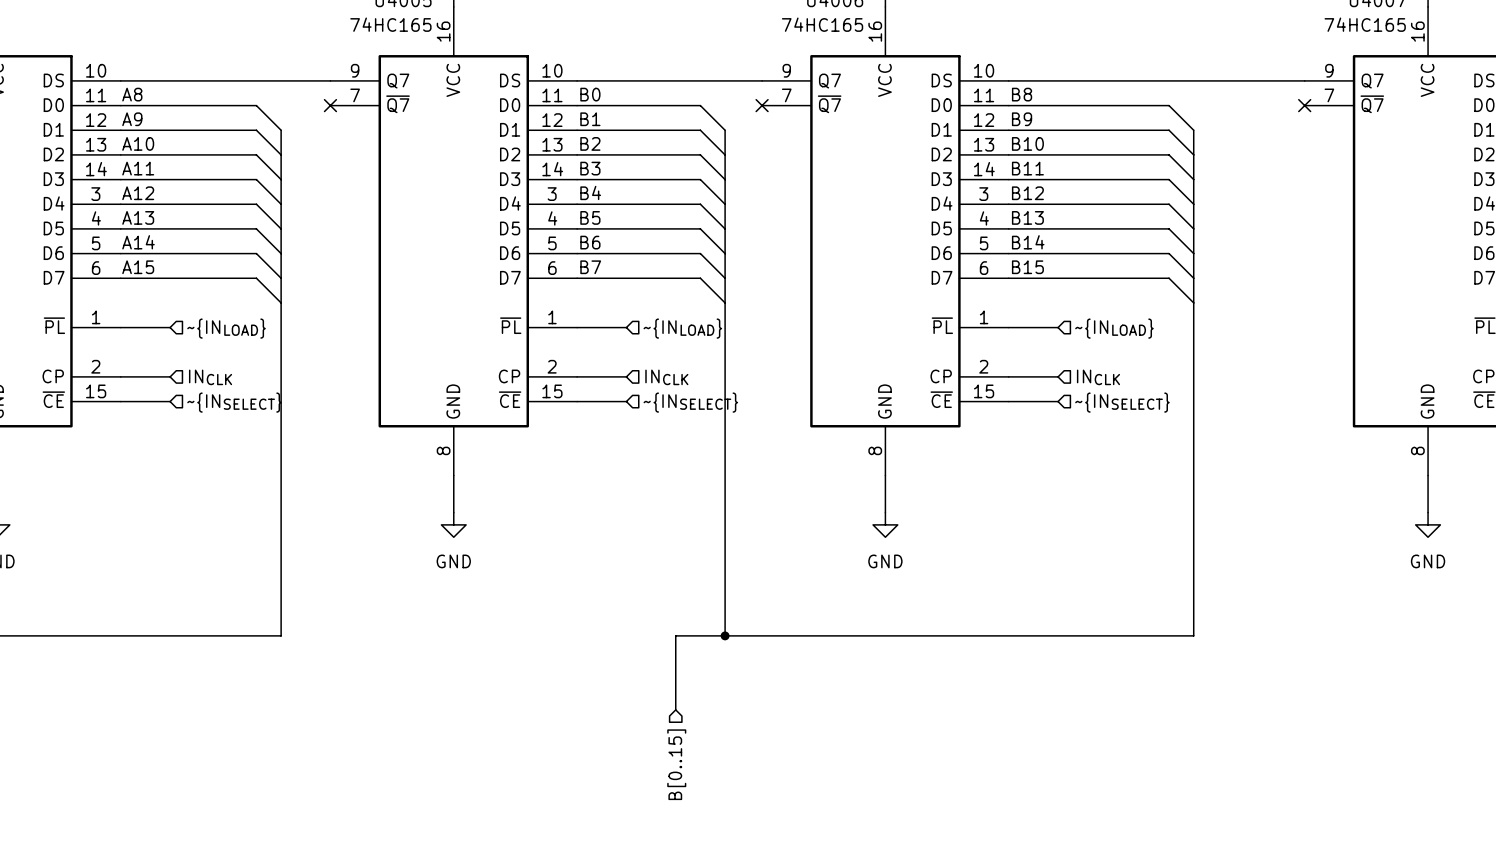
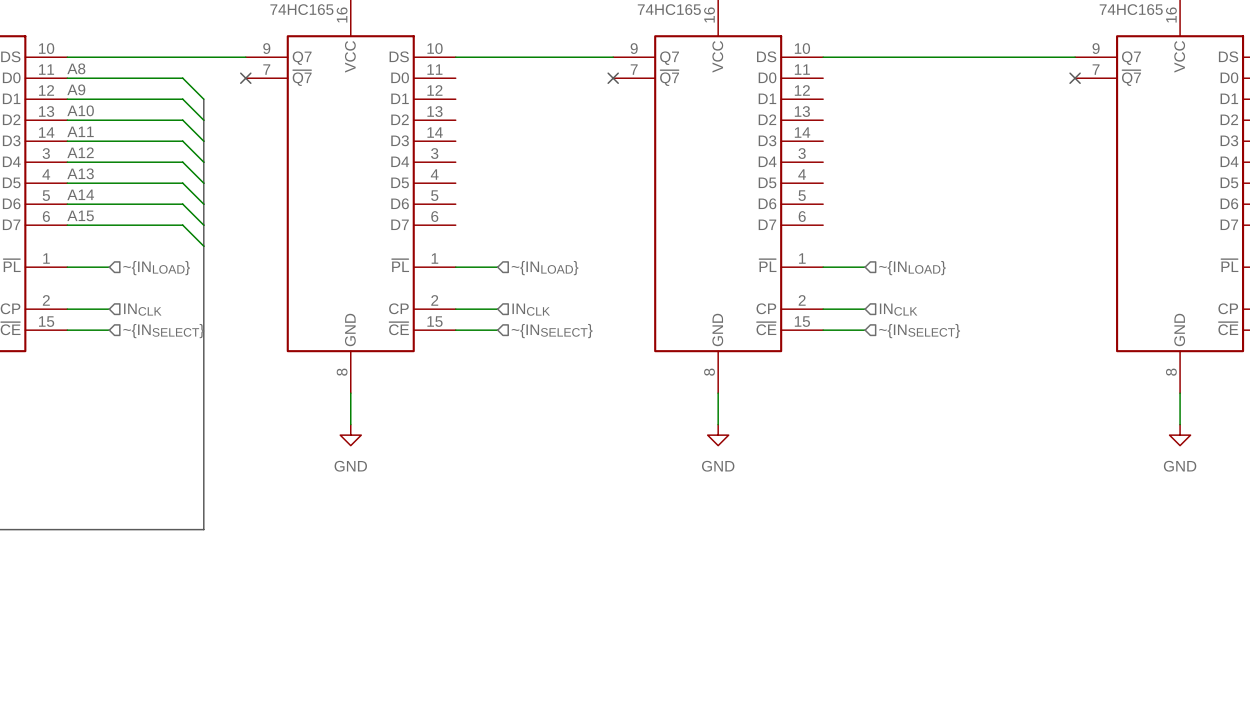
label: B0 (590, 94) -> none
label: B8 (1022, 94) -> none
wire: (577, 105) (700, 105) (725, 130) -> none
wire: (1008, 105) (1169, 105) (1193, 130) -> none
label: B1 (590, 119) -> none
label: B9 (1022, 119) -> none
wire: (577, 130) (700, 130) (725, 154) -> none
bus: (725, 130) (725, 635) -> none
wire: (1008, 130) (1169, 130) (1193, 154) -> none
bus: (1193, 130) (1193, 635) (675, 635) (675, 709) -> none
label: B2 (590, 143) -> none
label: B10 (1027, 143) -> none
wire: (577, 154) (700, 154) (725, 179) -> none
wire: (1008, 154) (1169, 154) (1193, 179) -> none
label: B3 (590, 168) -> none
label: B11 (1027, 168) -> none
wire: (577, 179) (700, 179) (725, 204) -> none
wire: (1008, 179) (1169, 179) (1193, 204) -> none
label: B4 (590, 192) -> none
label: B12 (1027, 193) -> none
wire: (577, 204) (700, 204) (725, 228) -> none
wire: (1008, 204) (1169, 204) (1193, 228) -> none
label: B5 (590, 217) -> none
label: B13 (1027, 217) -> none
wire: (577, 228) (700, 228) (725, 253) -> none
wire: (1008, 228) (1169, 228) (1193, 253) -> none
label: B6 (590, 242) -> none
label: B14 (1028, 242) -> none
wire: (577, 253) (700, 253) (725, 278) -> none
wire: (1008, 253) (1169, 253) (1193, 278) -> none
label: B7 (590, 267) -> none
label: B15 (1027, 267) -> none
wire: (577, 278) (700, 278) (725, 302) -> none
wire: (1008, 278) (1169, 278) (1193, 302) -> none
junction: (725, 635) -> none
hierarchical label: B[0..15] (676, 764) -> none

